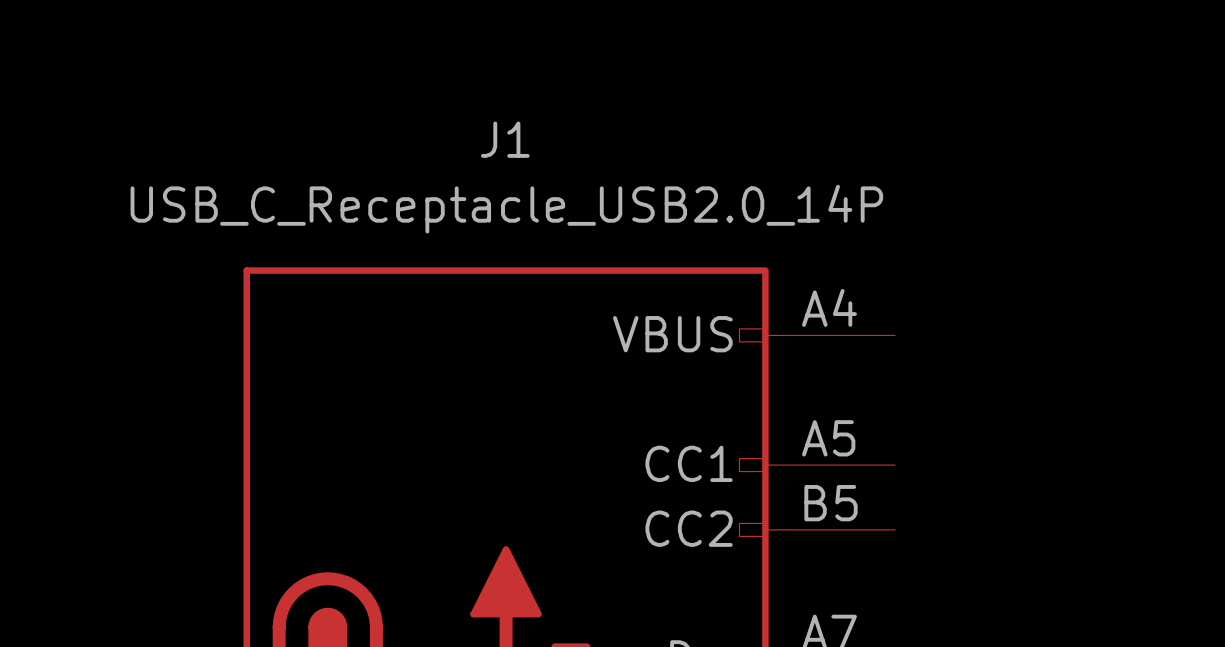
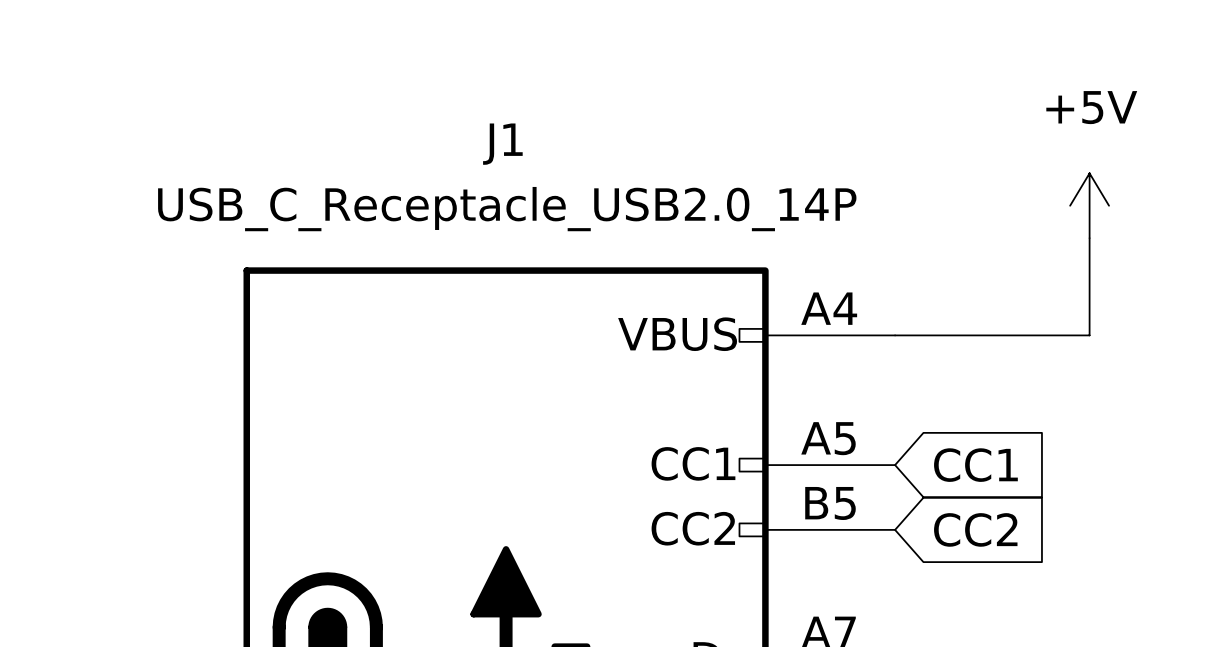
power symbol: none -> +5V (1089, 205)
wire: none -> (1089, 238) (1089, 335) (895, 335)
global label: none -> CC1 (975, 465)
global label: none -> CC2 (975, 529)

